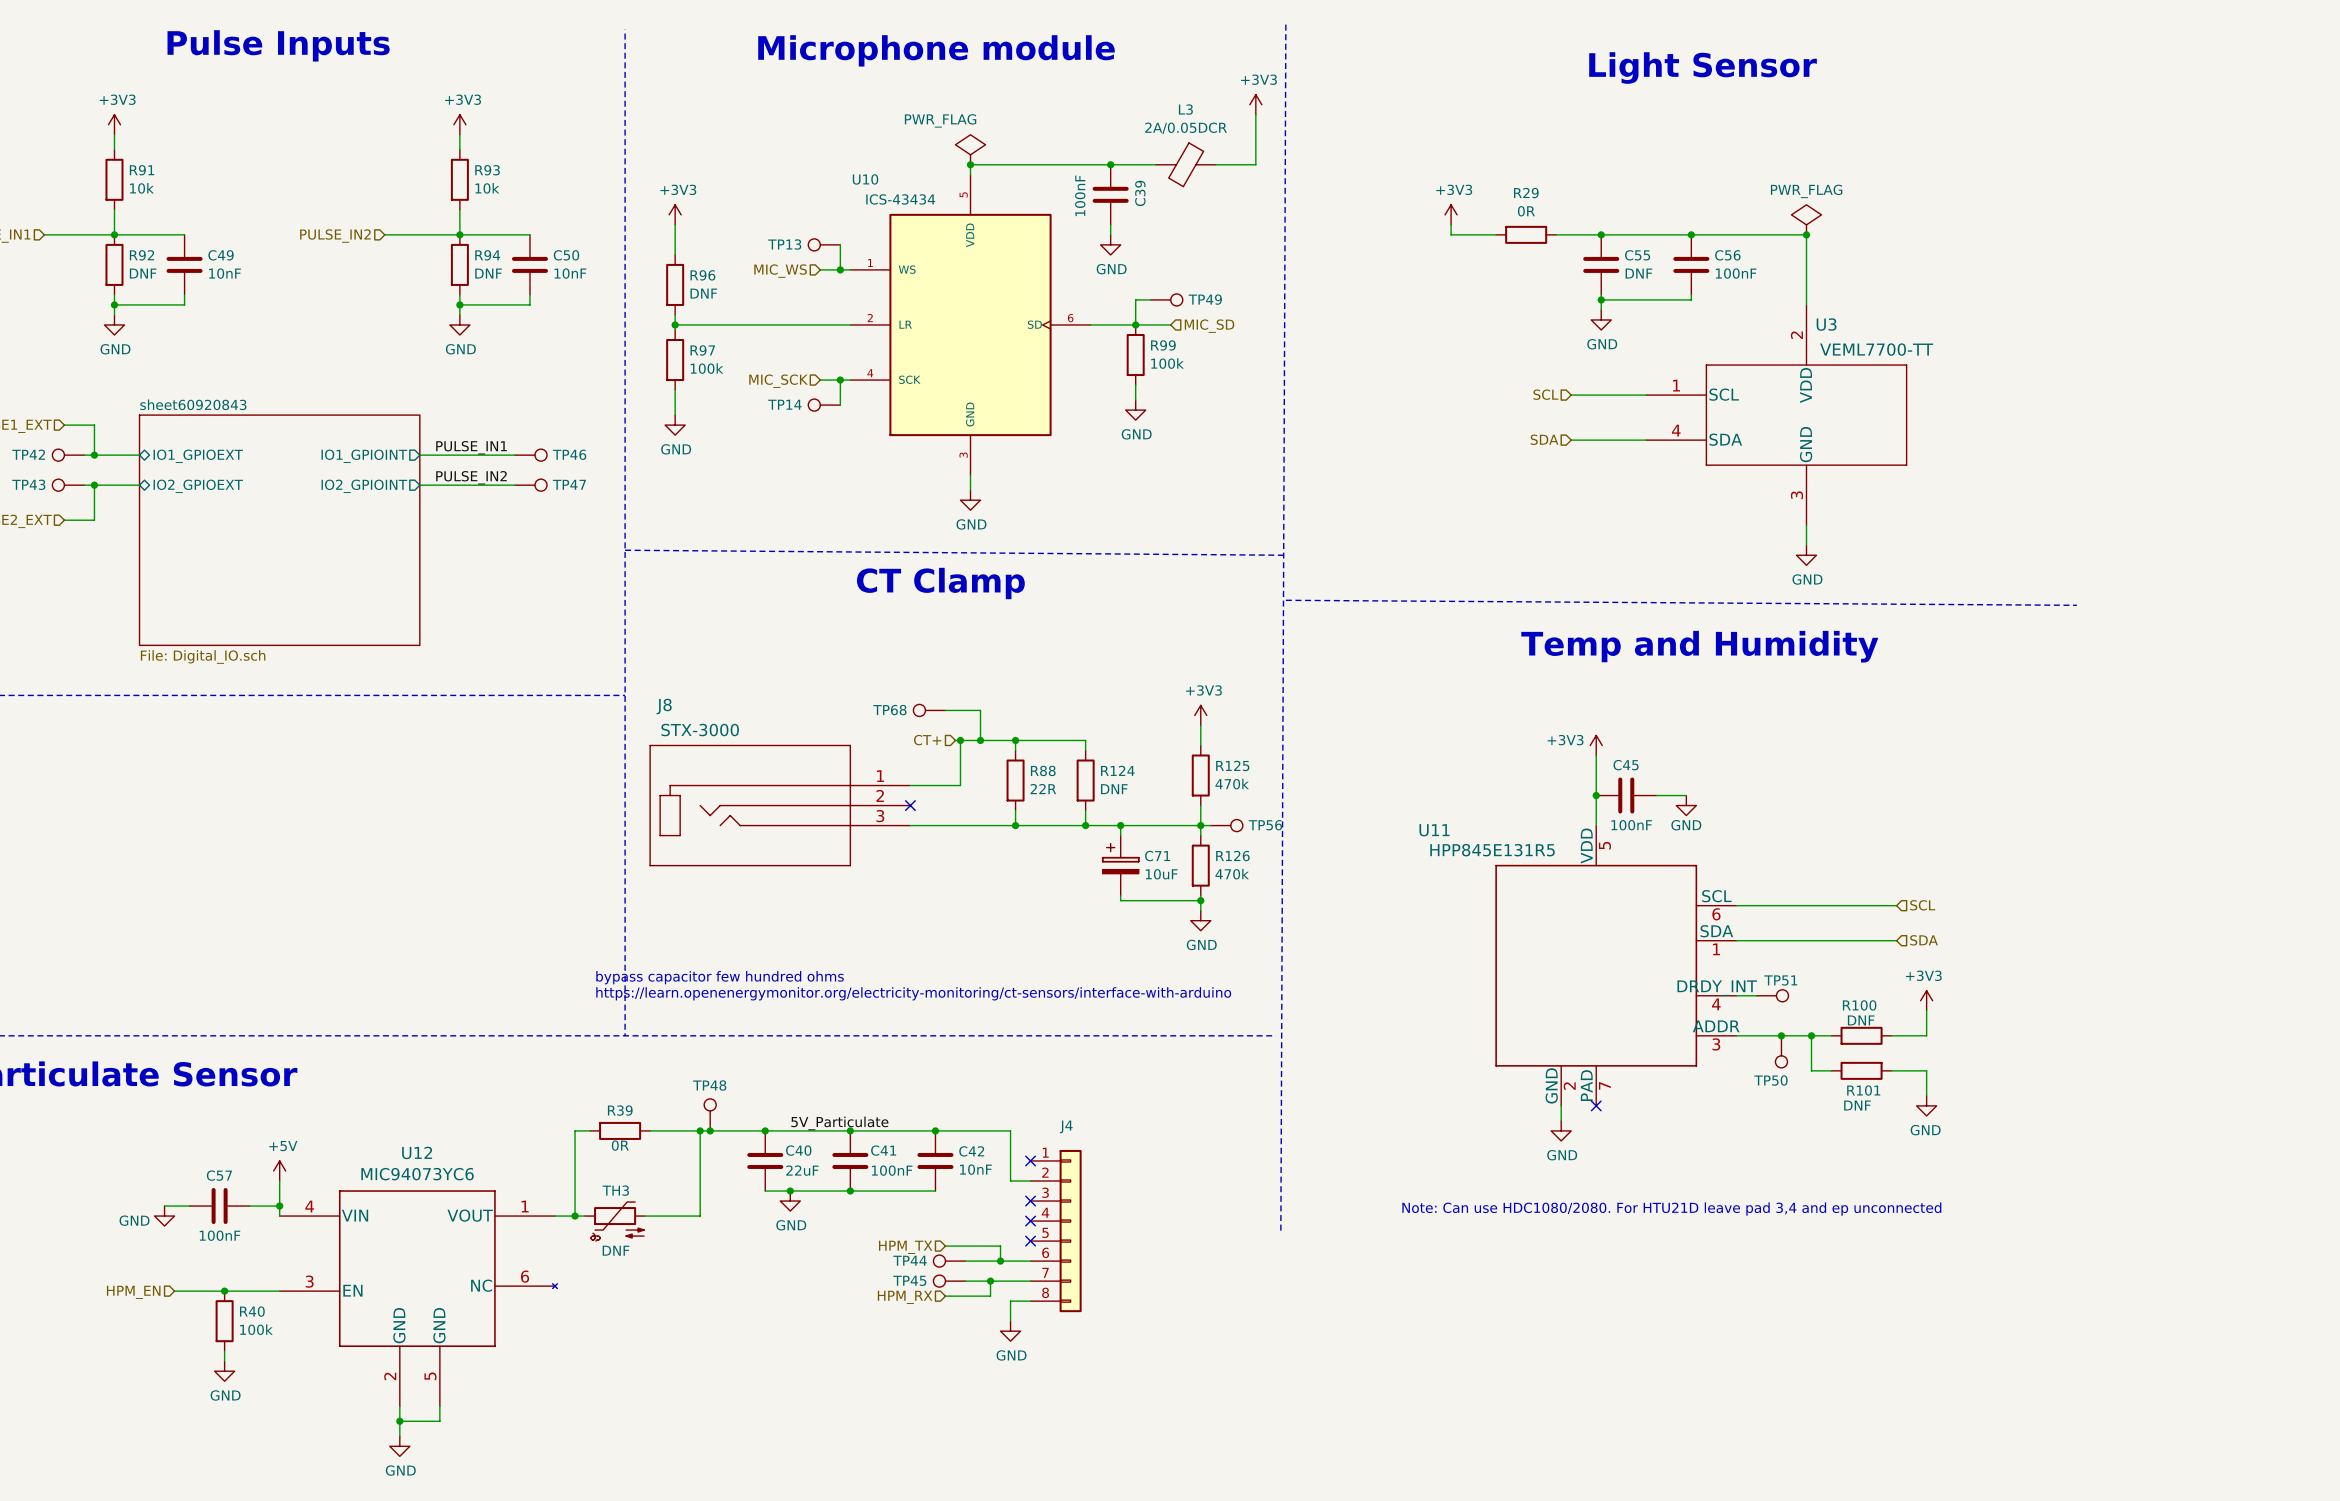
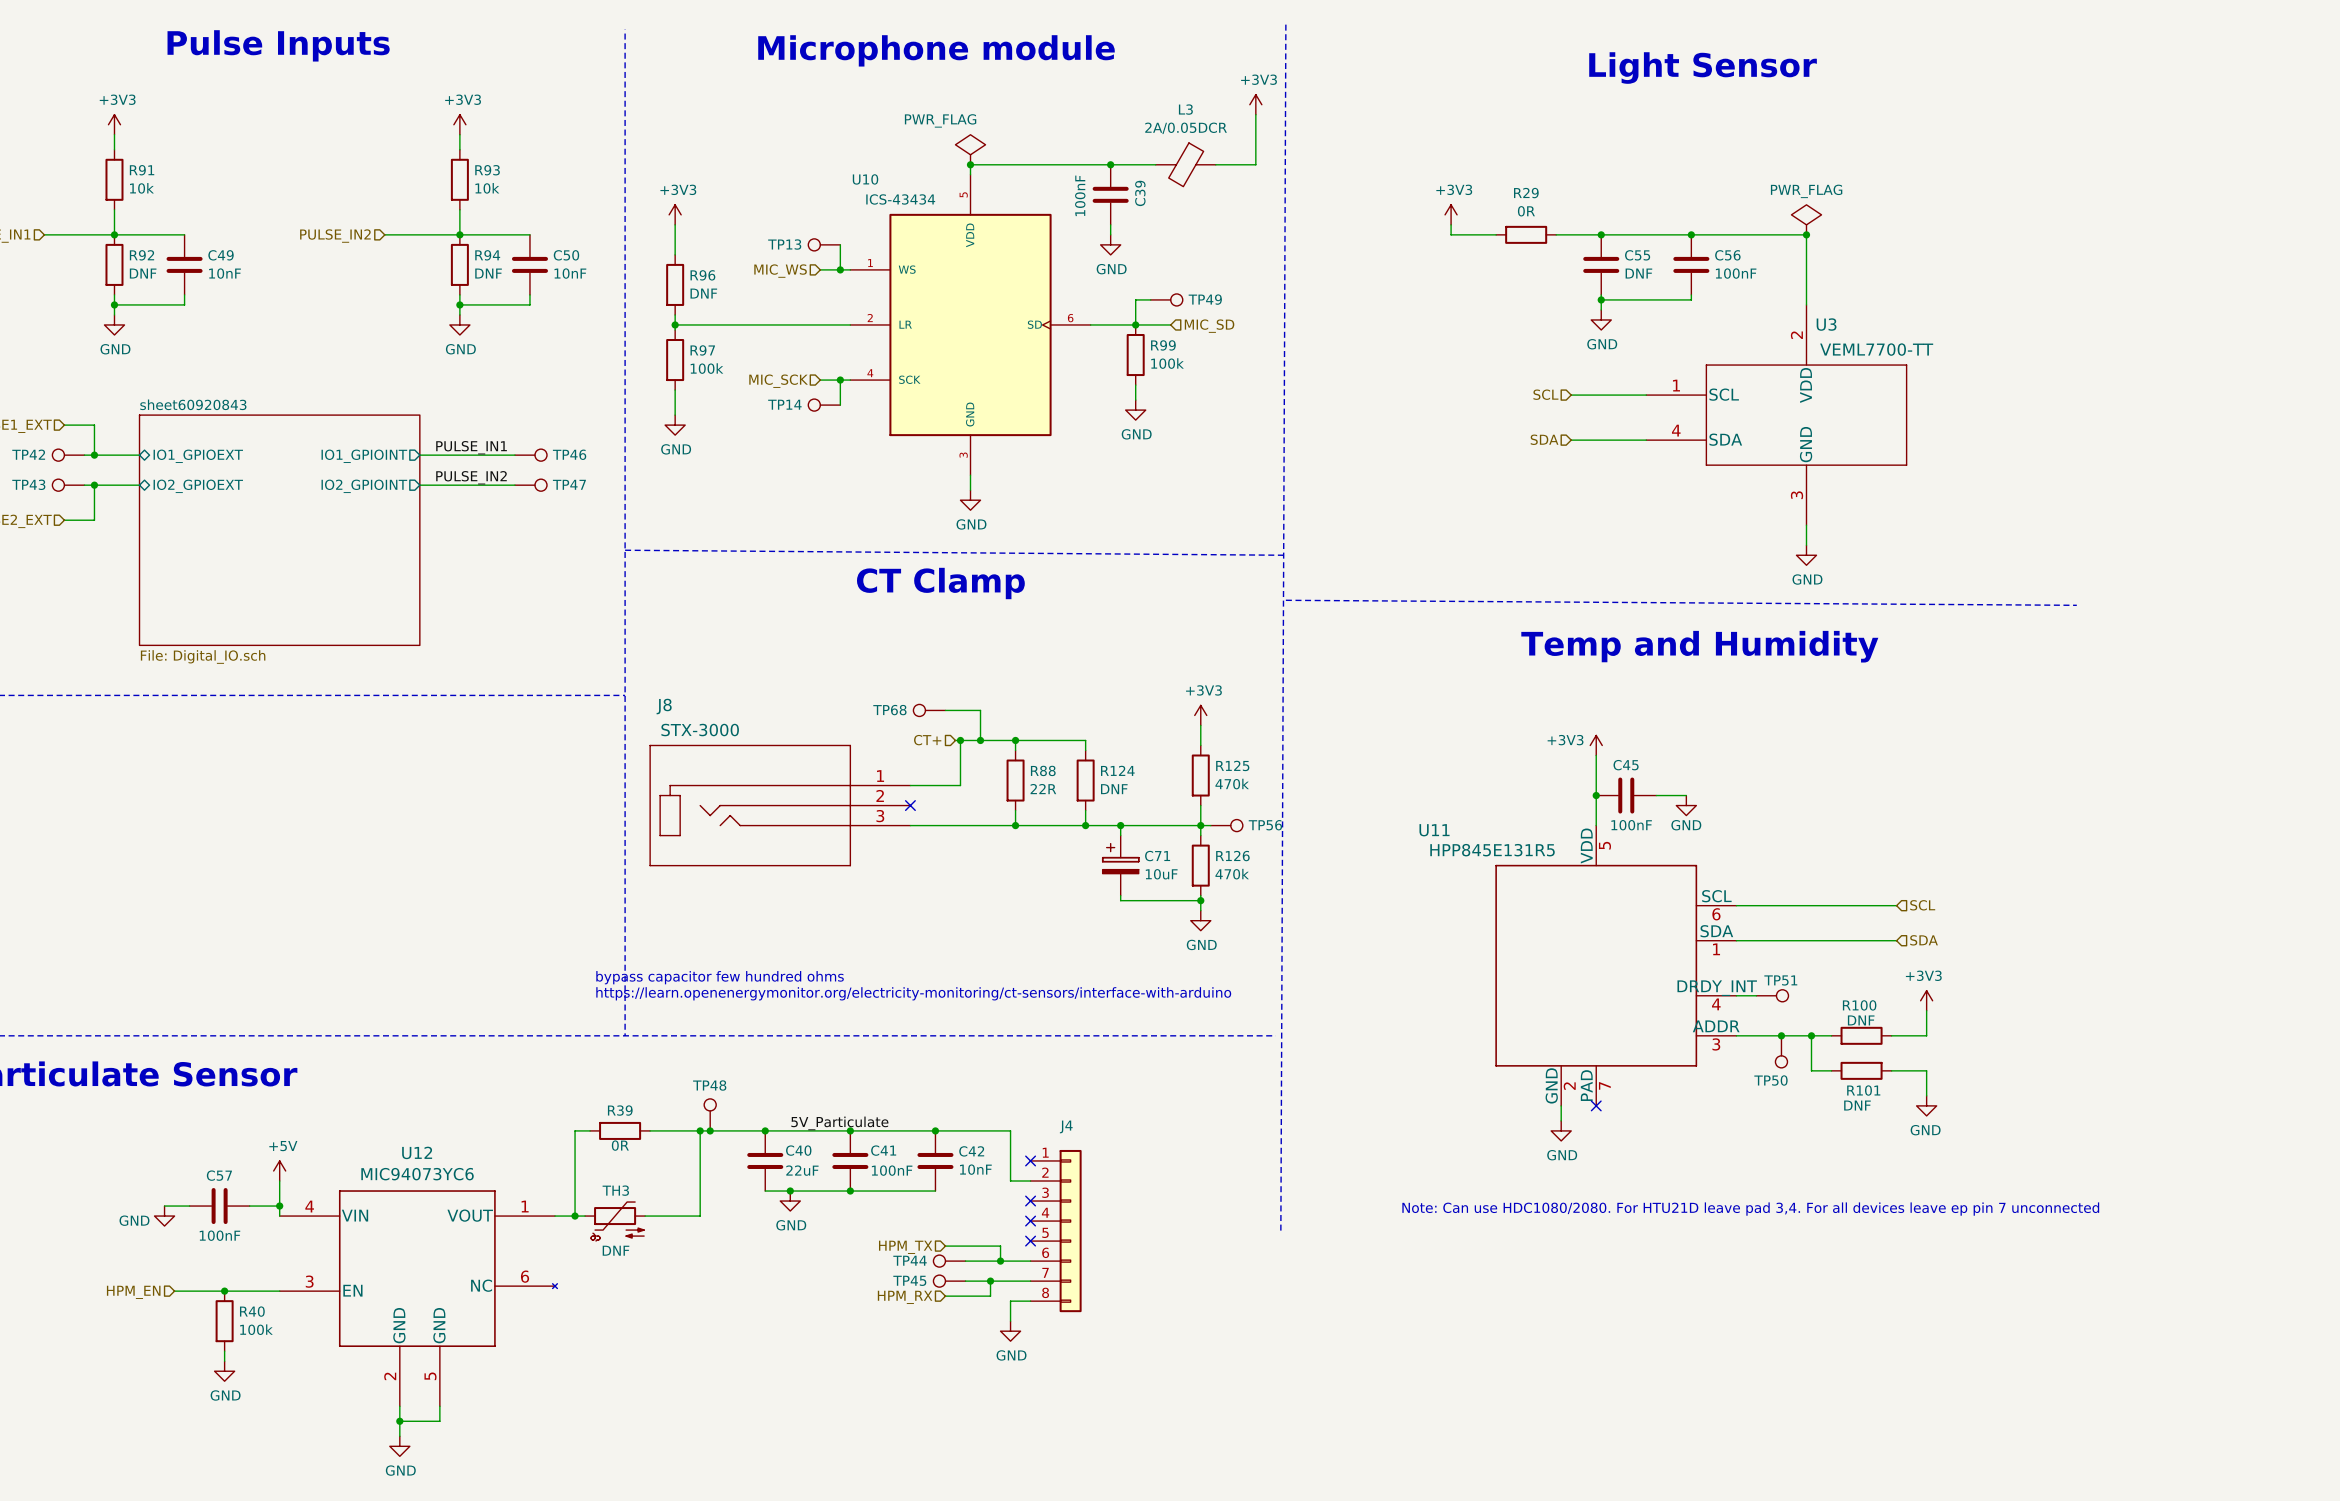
text: Note: Can use HDC1080/2080. For HTU21D leave pad 3,4 and ep unconnected (1671, 1209) -> Note: Can use HDC1080/2080. For HTU21D leave pad 3,4. For all devices leave ep pin 7 unconnected (1750, 1209)

